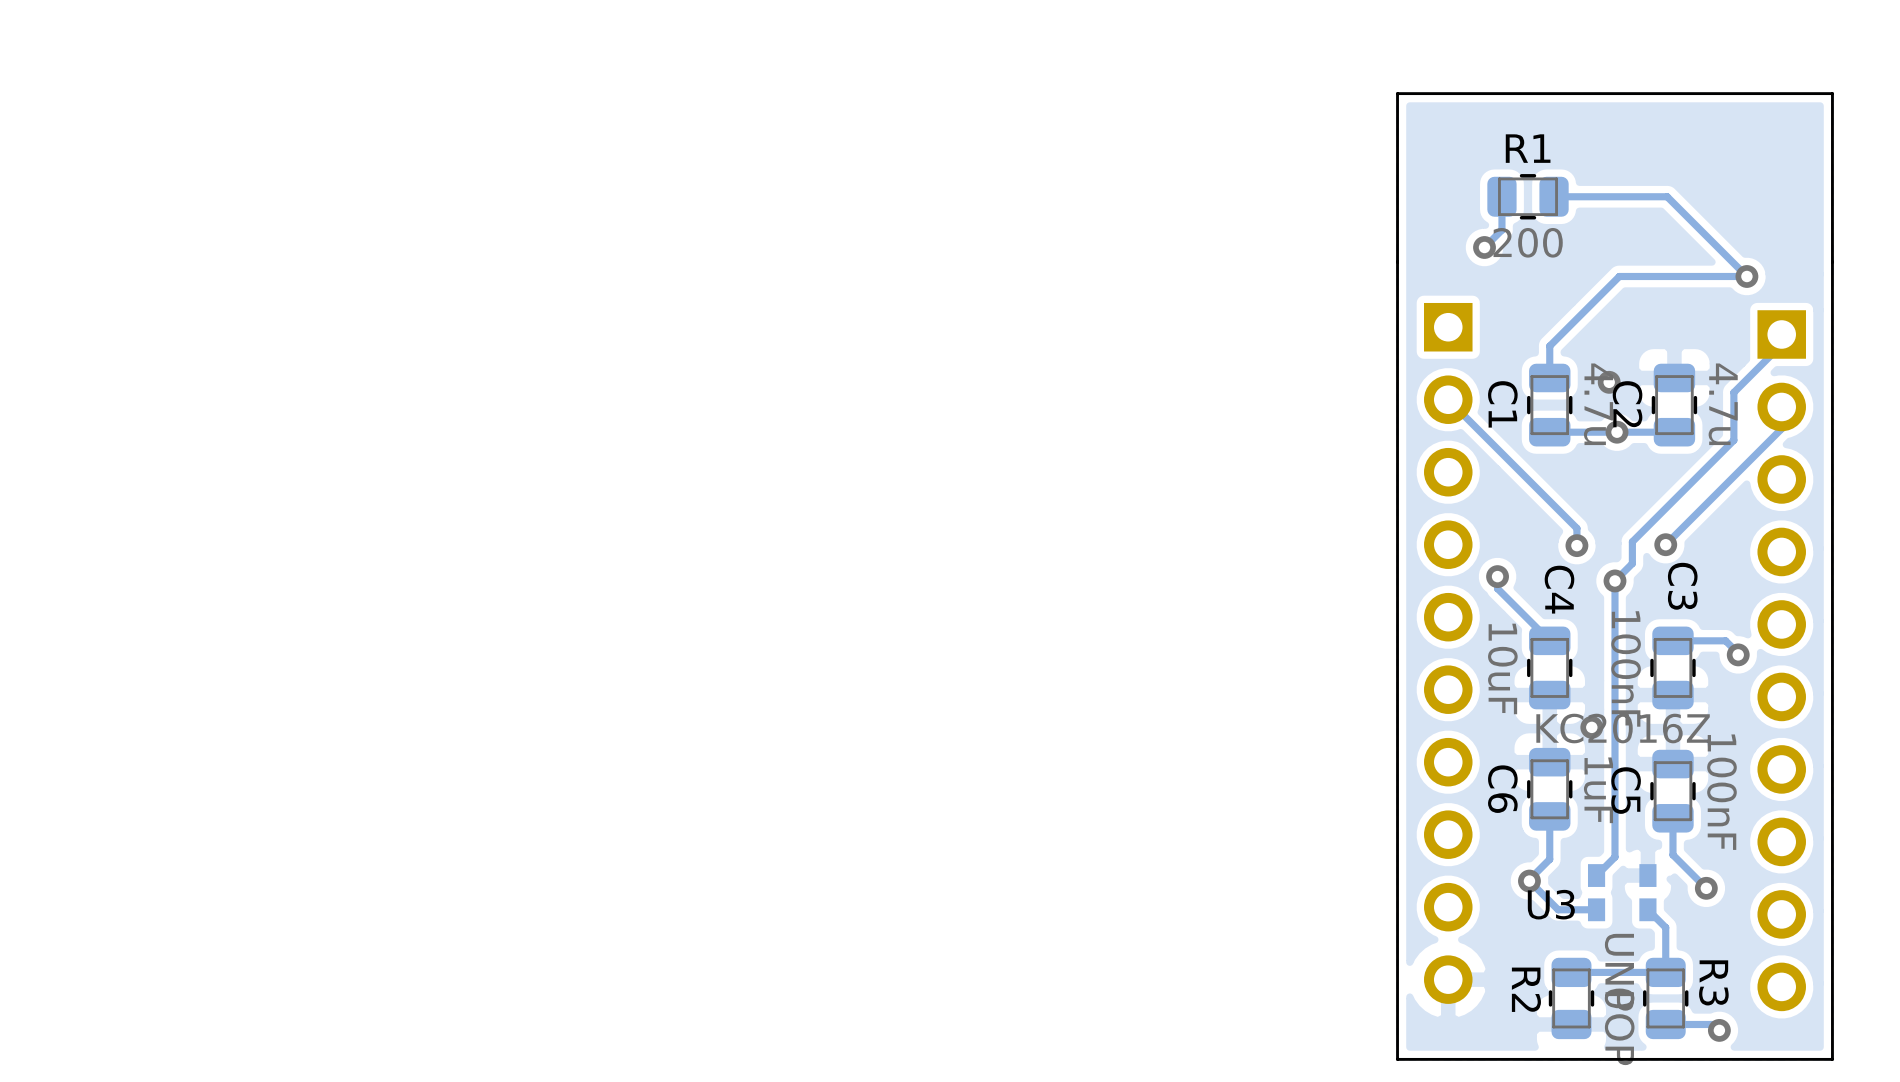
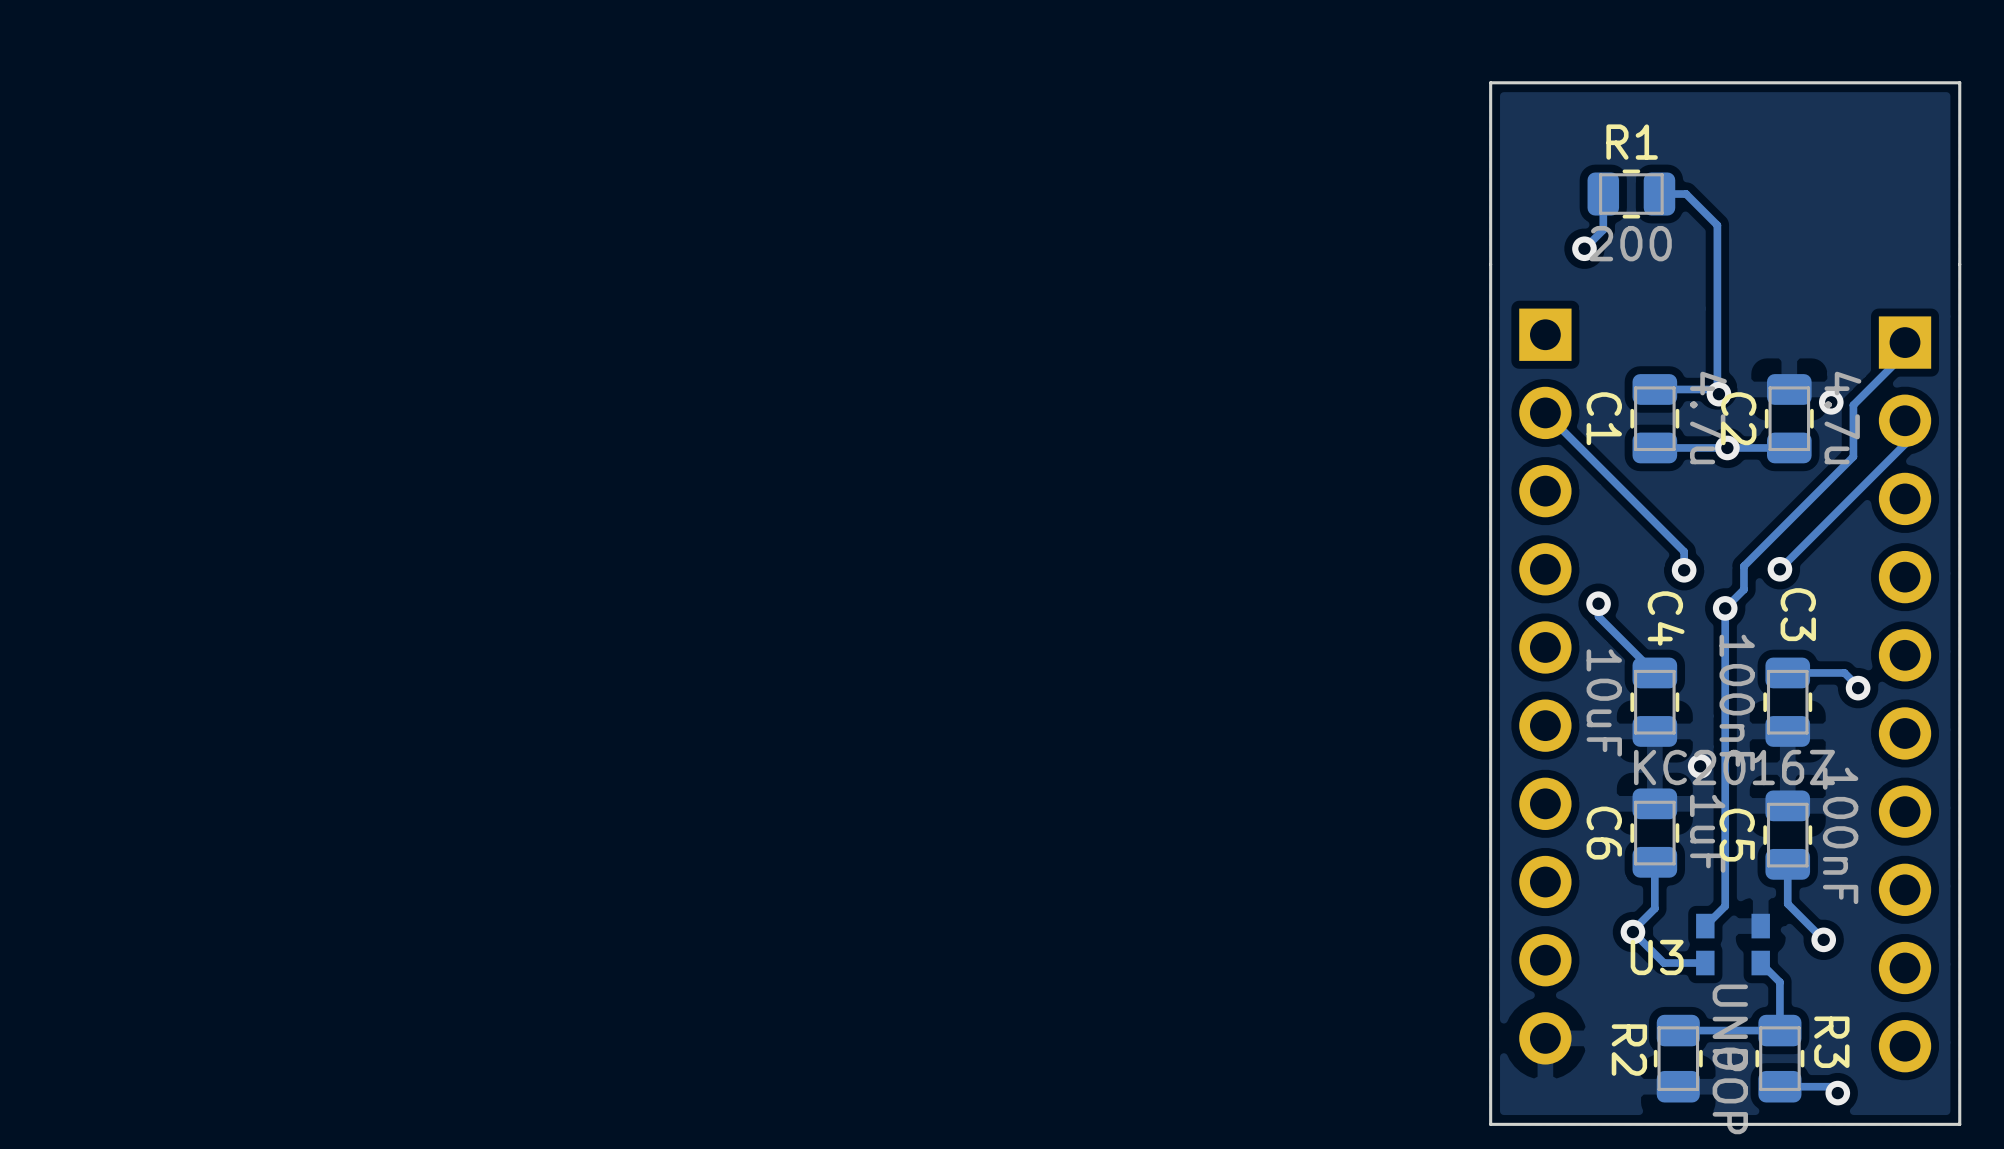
track: (1578, 196) (1667, 196) (1746, 276) (1619, 276) (1549, 346) (1549, 377) -> (1686, 194) (1717, 225) (1717, 389) (1654, 389)
via position: (1746, 276) -> (1831, 402)

